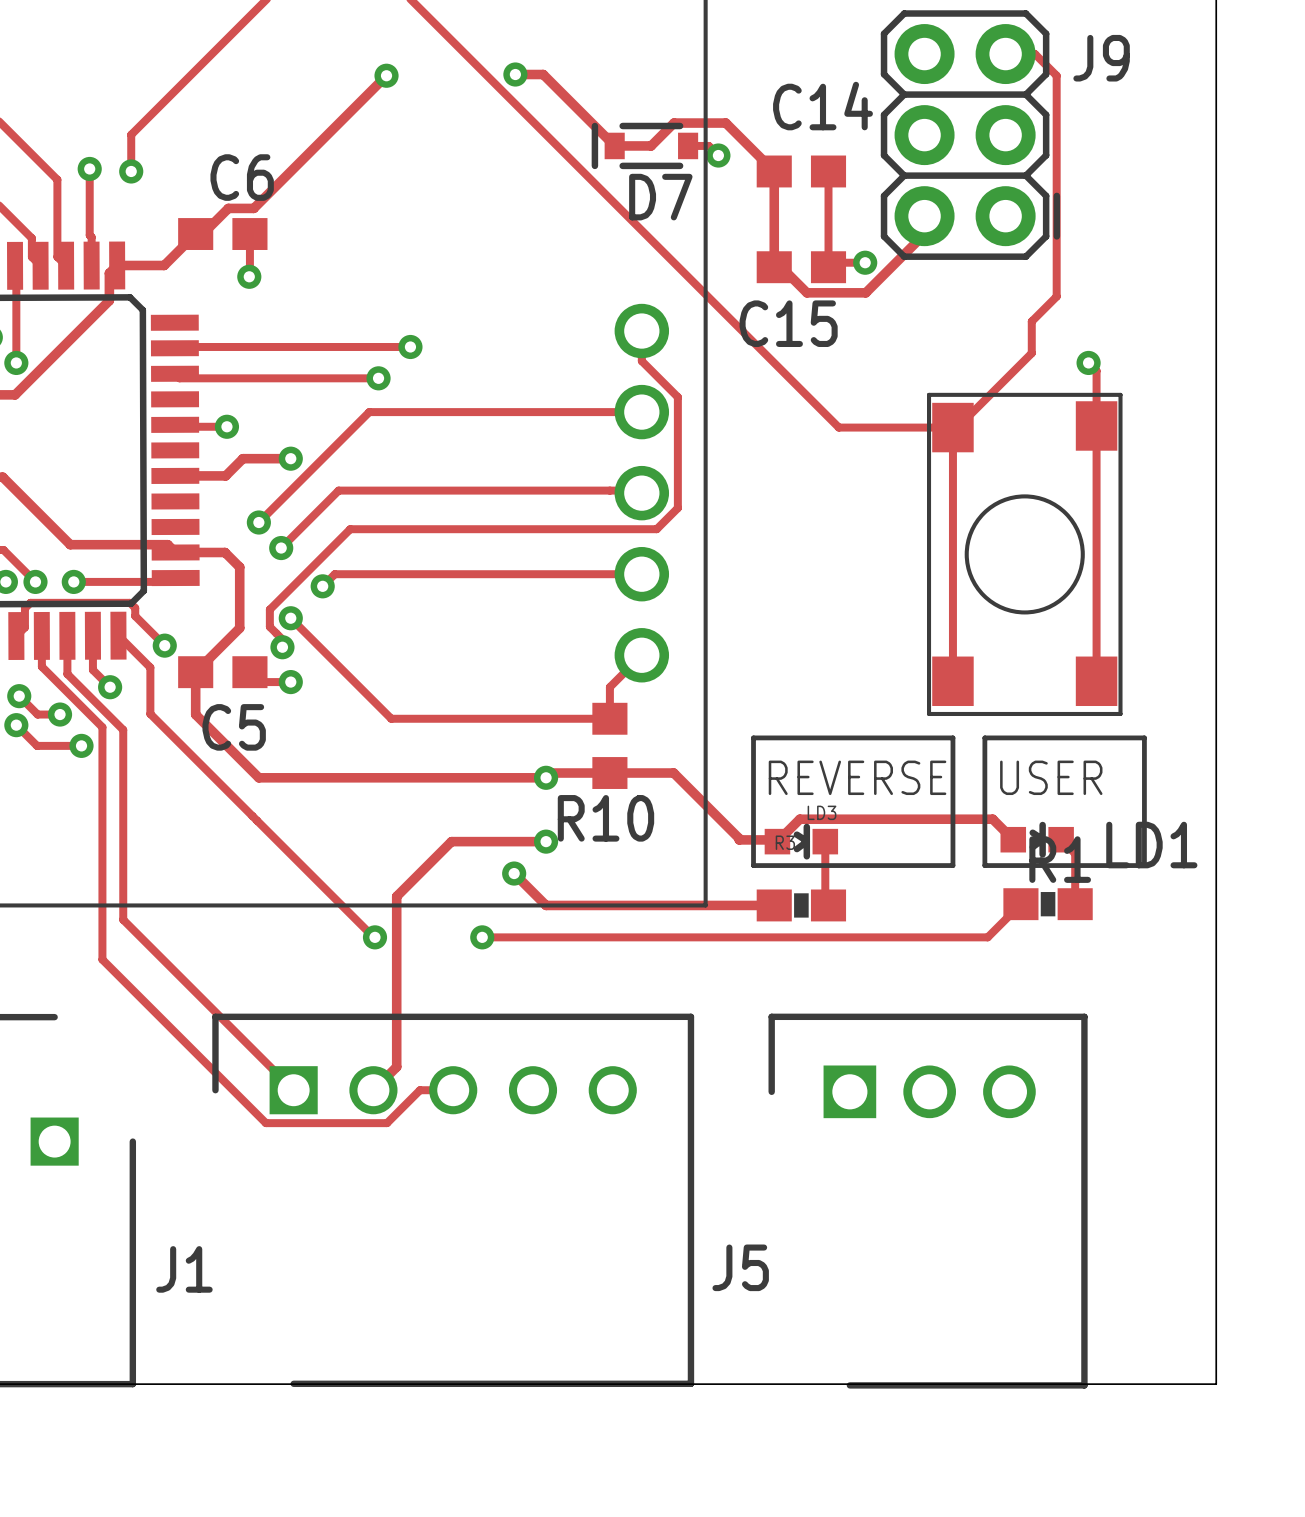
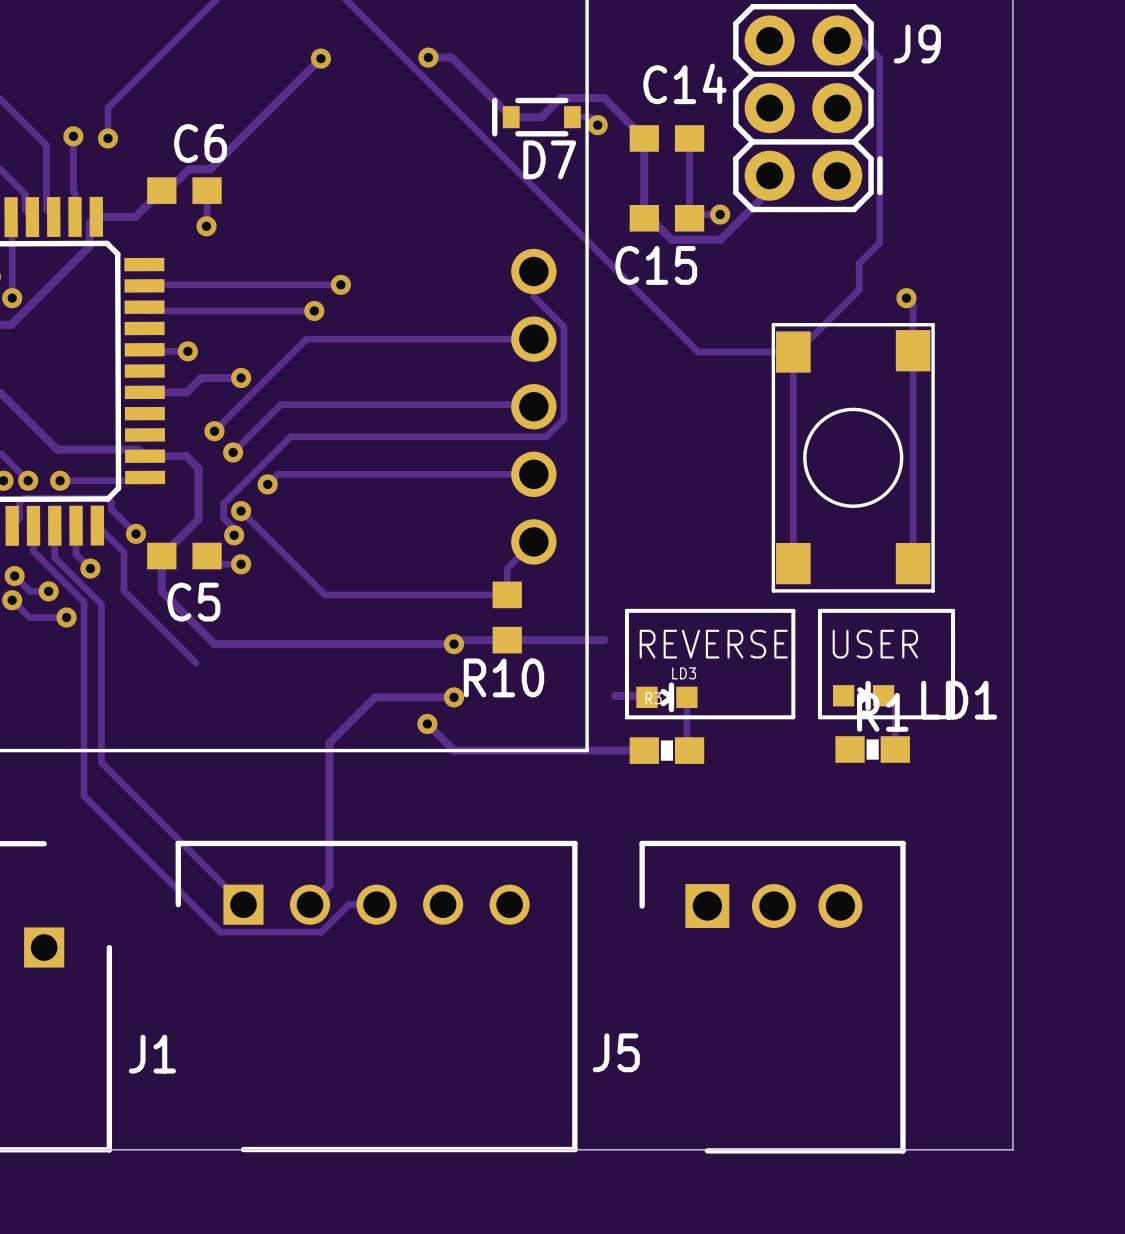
track: (673, 773) (739, 839) -> (560, 640) (604, 640)
track: (236, 800) (374, 937) -> none
track: (1012, 839) (992, 819) (799, 819) (777, 841) -> none
track: (1020, 904) (987, 937) (482, 937) -> none
via: (374, 937) -> none
via: (482, 937) -> none

